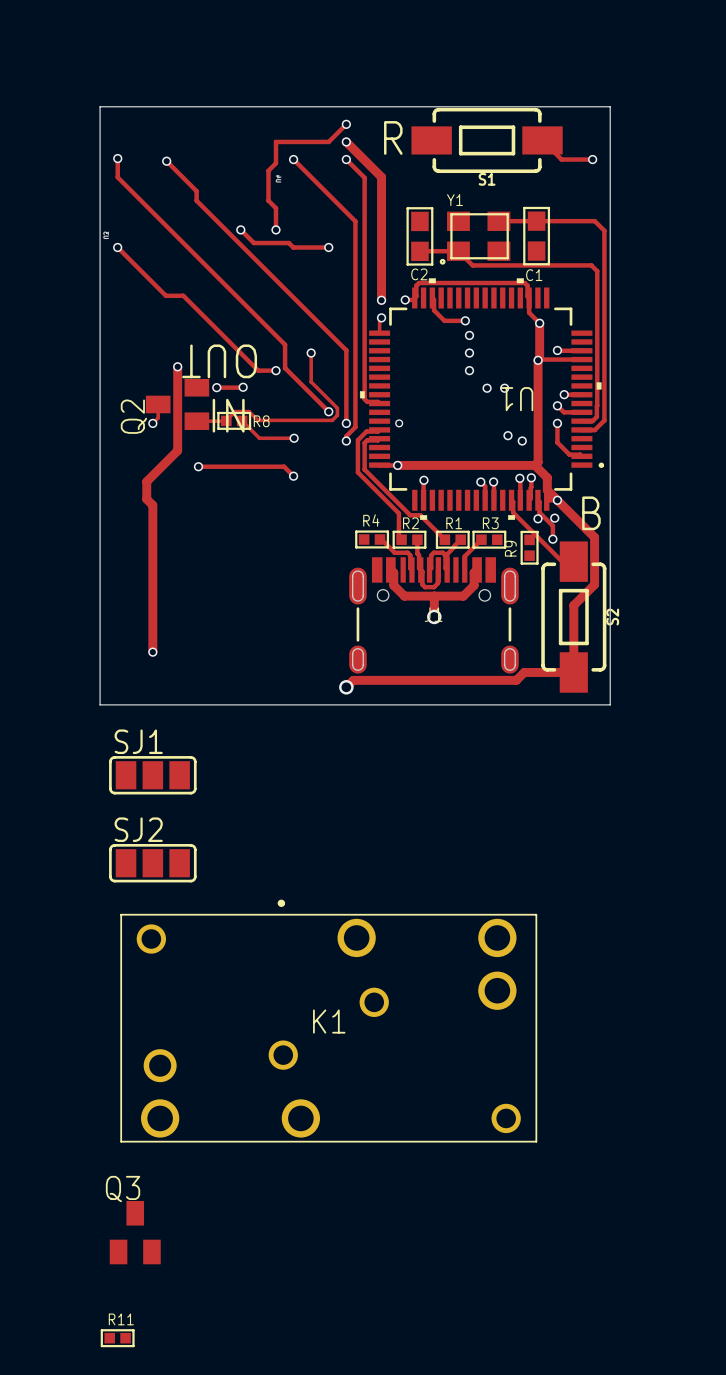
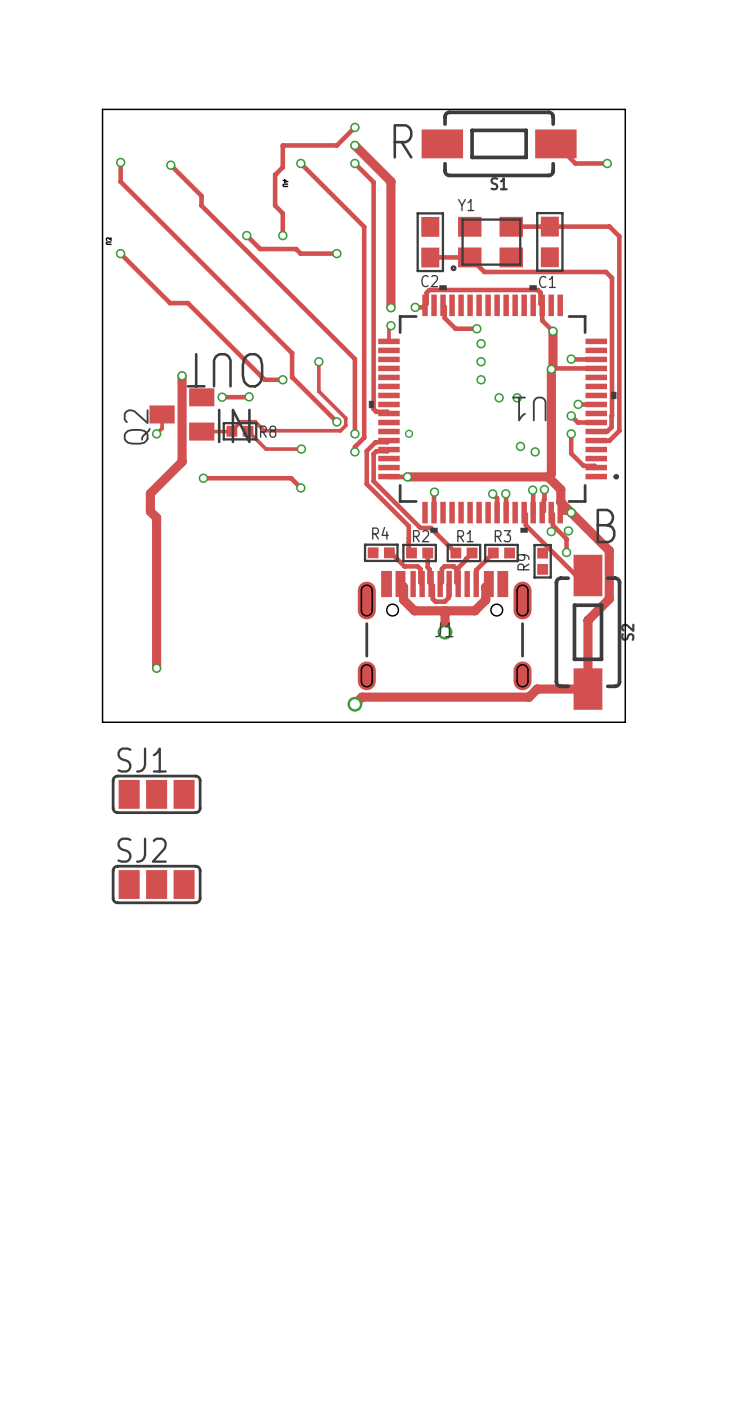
K1: (328, 1021) -> none
Q3: (135, 1232) -> none
R11: (117, 1338) -> none

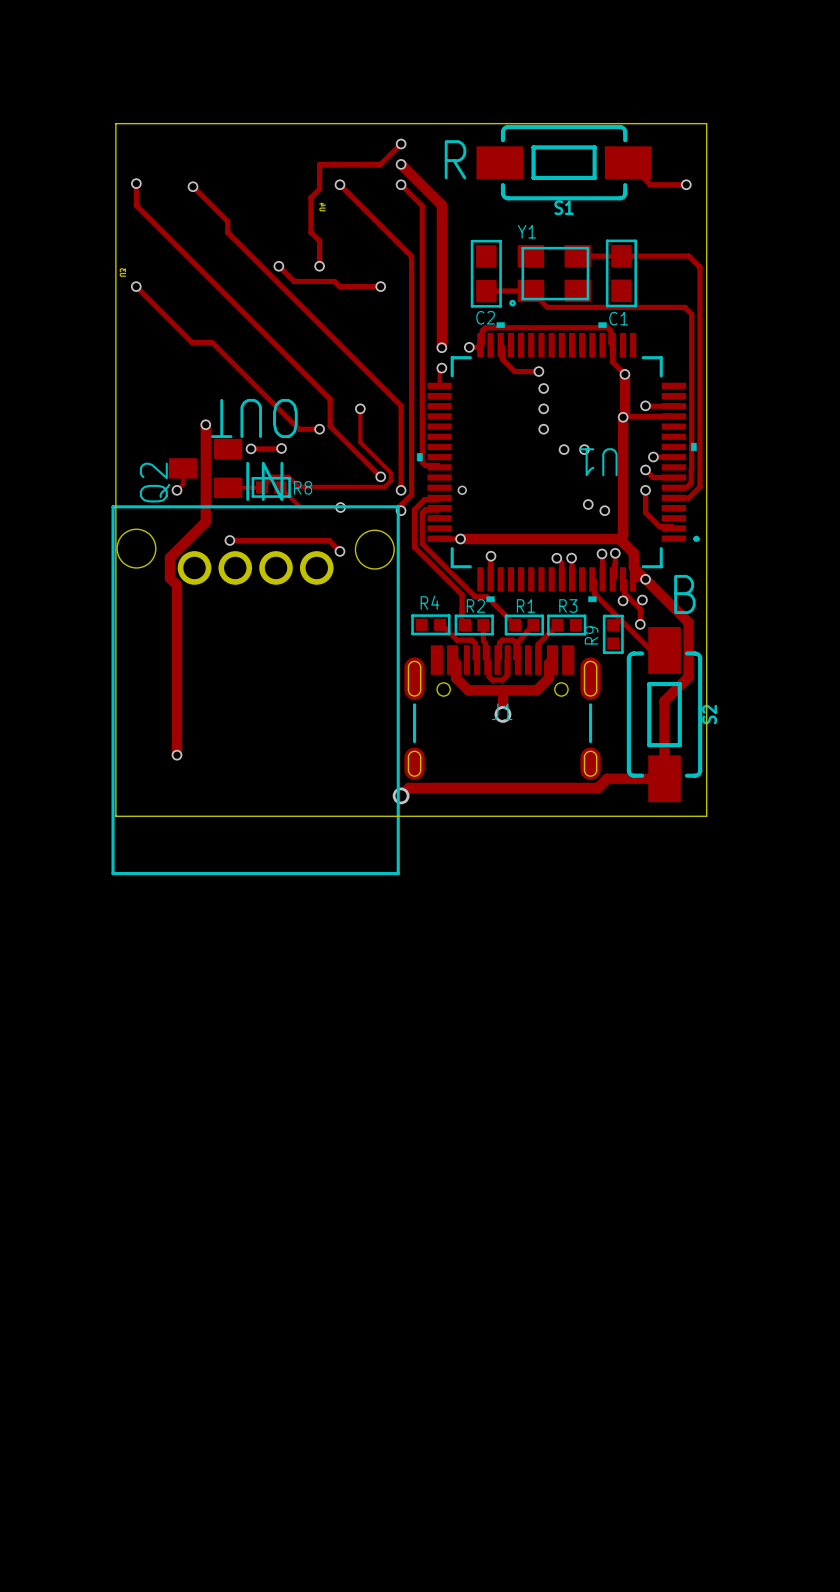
part: none -> (255, 690)
SJ1: (156, 794) -> none
SJ2: (156, 884) -> none

